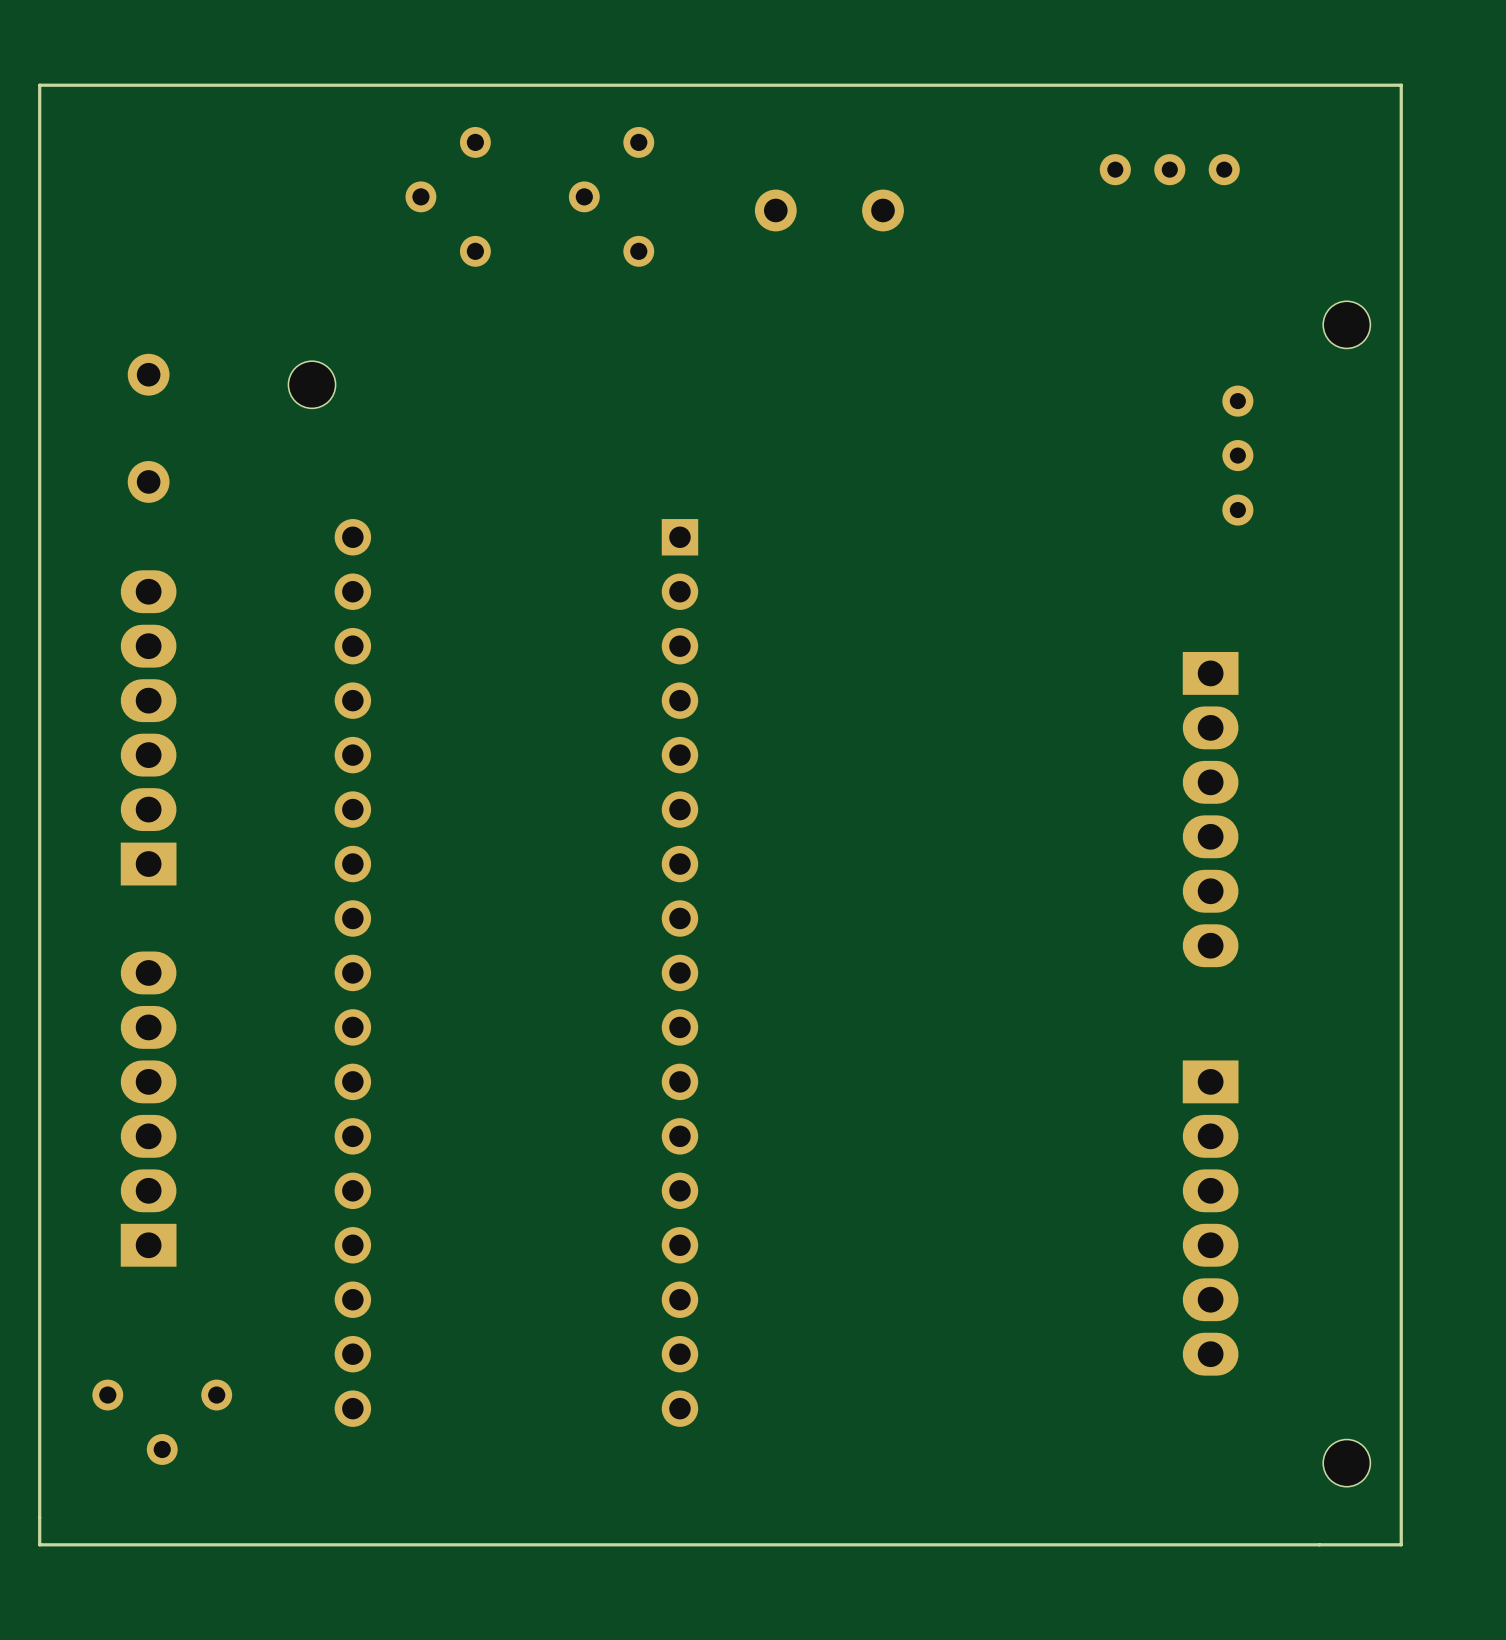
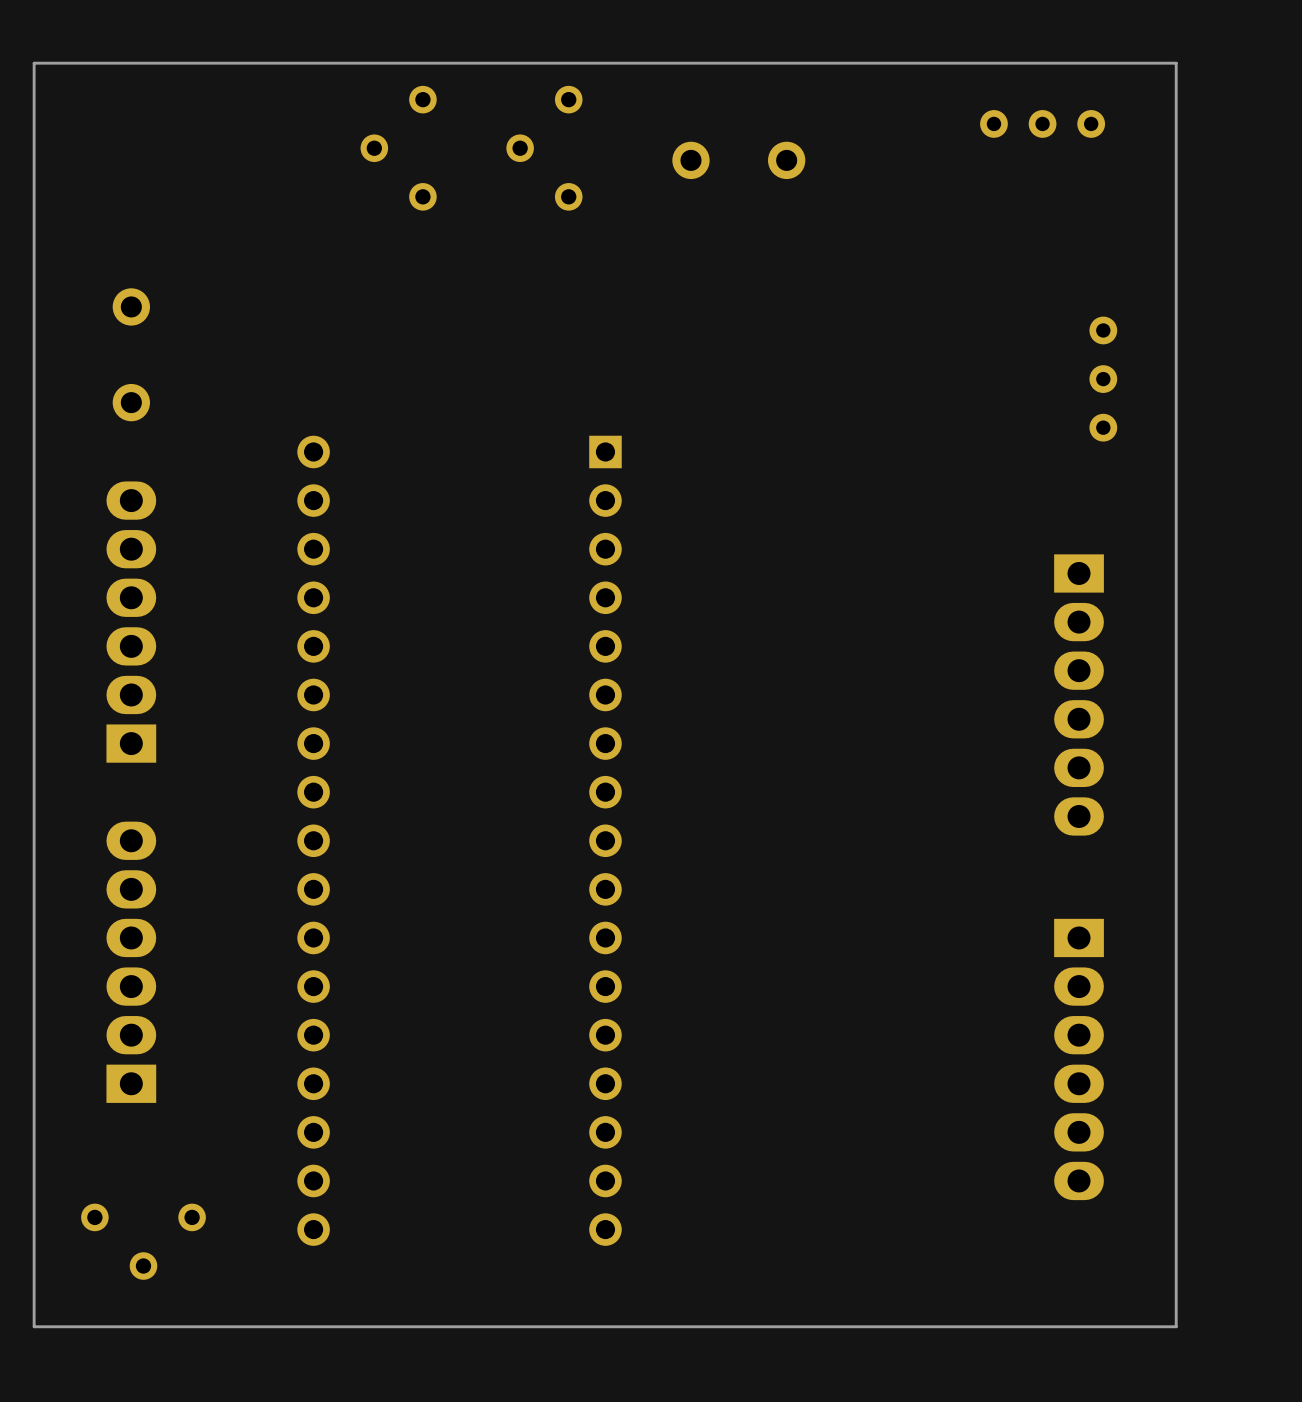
board edge: (39, 101) (39, 85) (1401, 85) (1401, 1544) (39, 1544) (39, 1517) -> (34, 63) (1176, 63) (1176, 1326) (34, 1326)
part: (1346, 324) -> none
part: (312, 384) -> none
part: (1346, 1463) -> none

